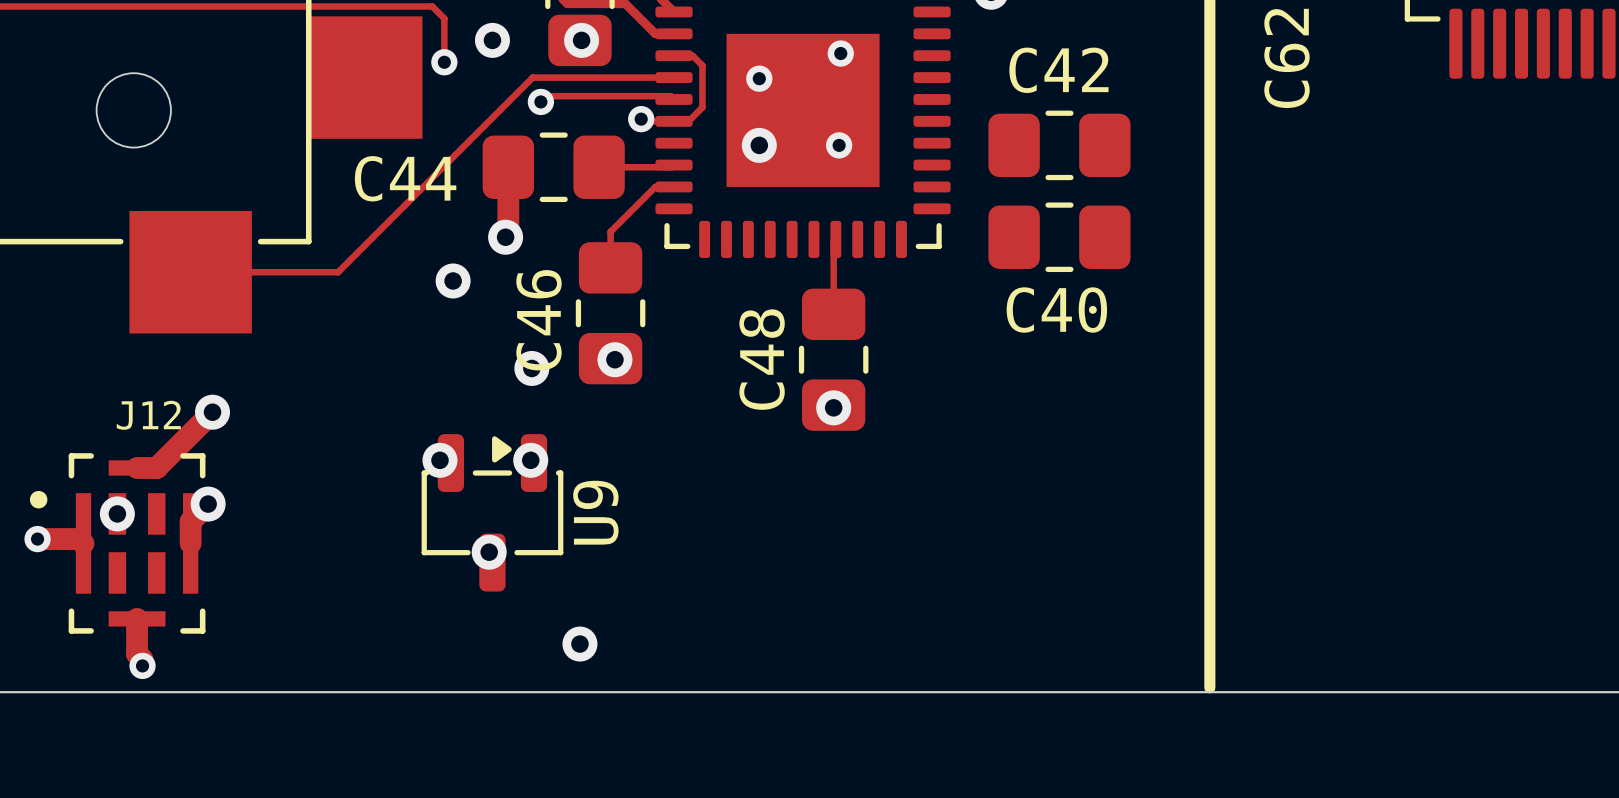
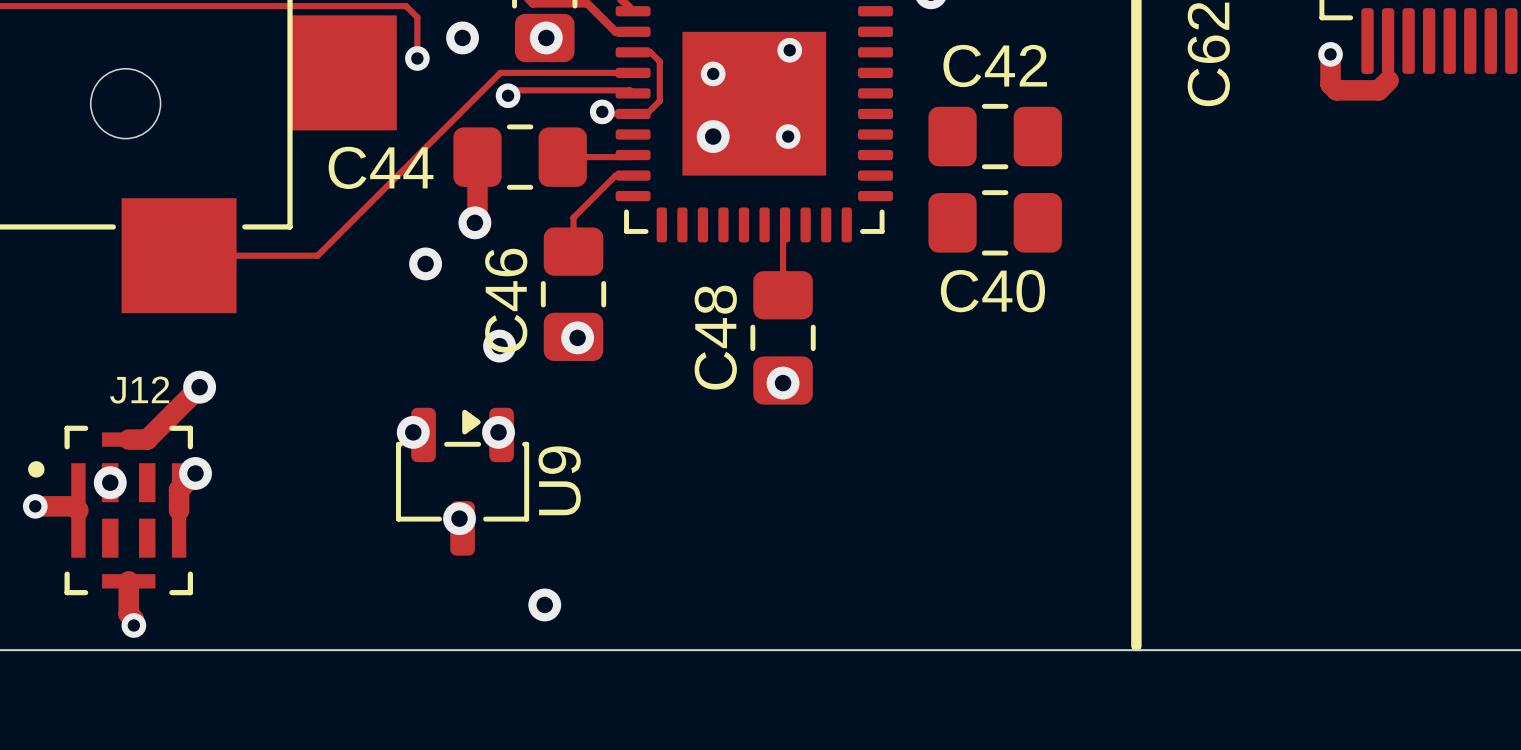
track: none -> (1330, 54) (1330, 84) (1336, 90) (1378, 90) (1388, 80)
via: none -> (1330, 54)

